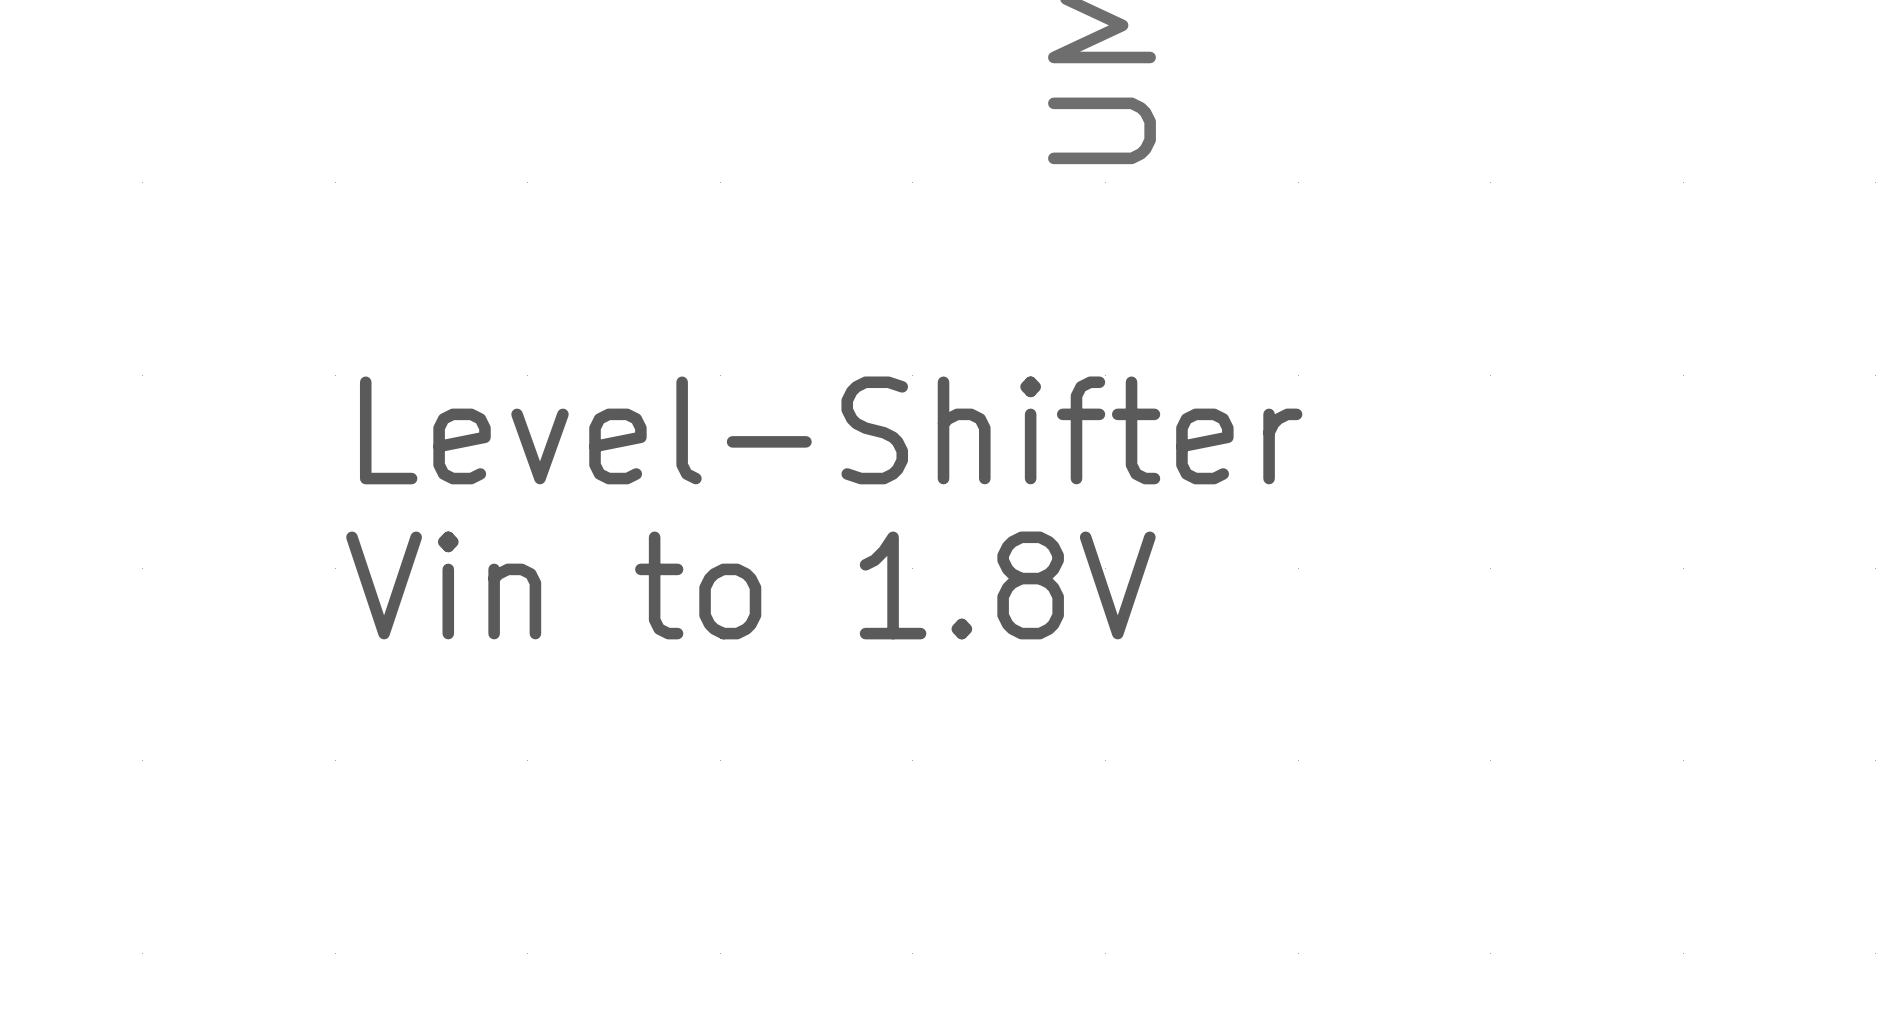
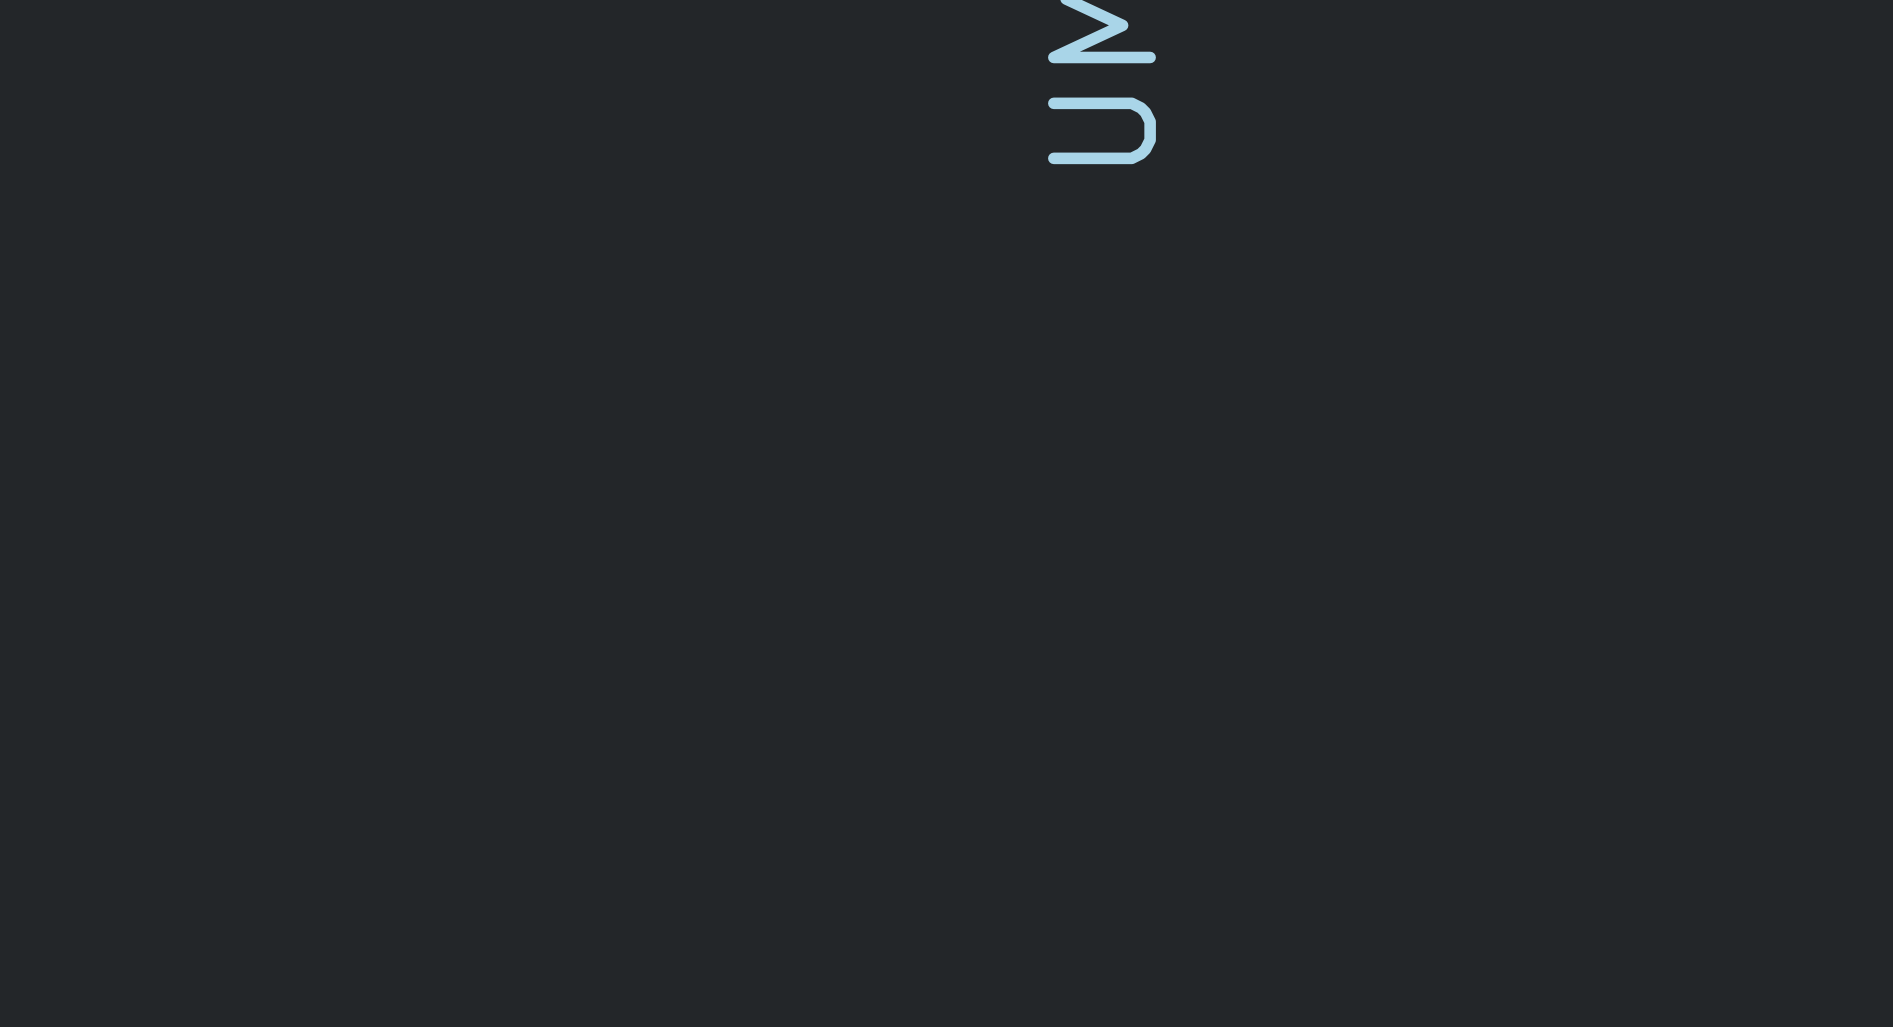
text: Level-Shifter (831, 430) -> none
text: Vin to 1.8V (750, 585) -> none

